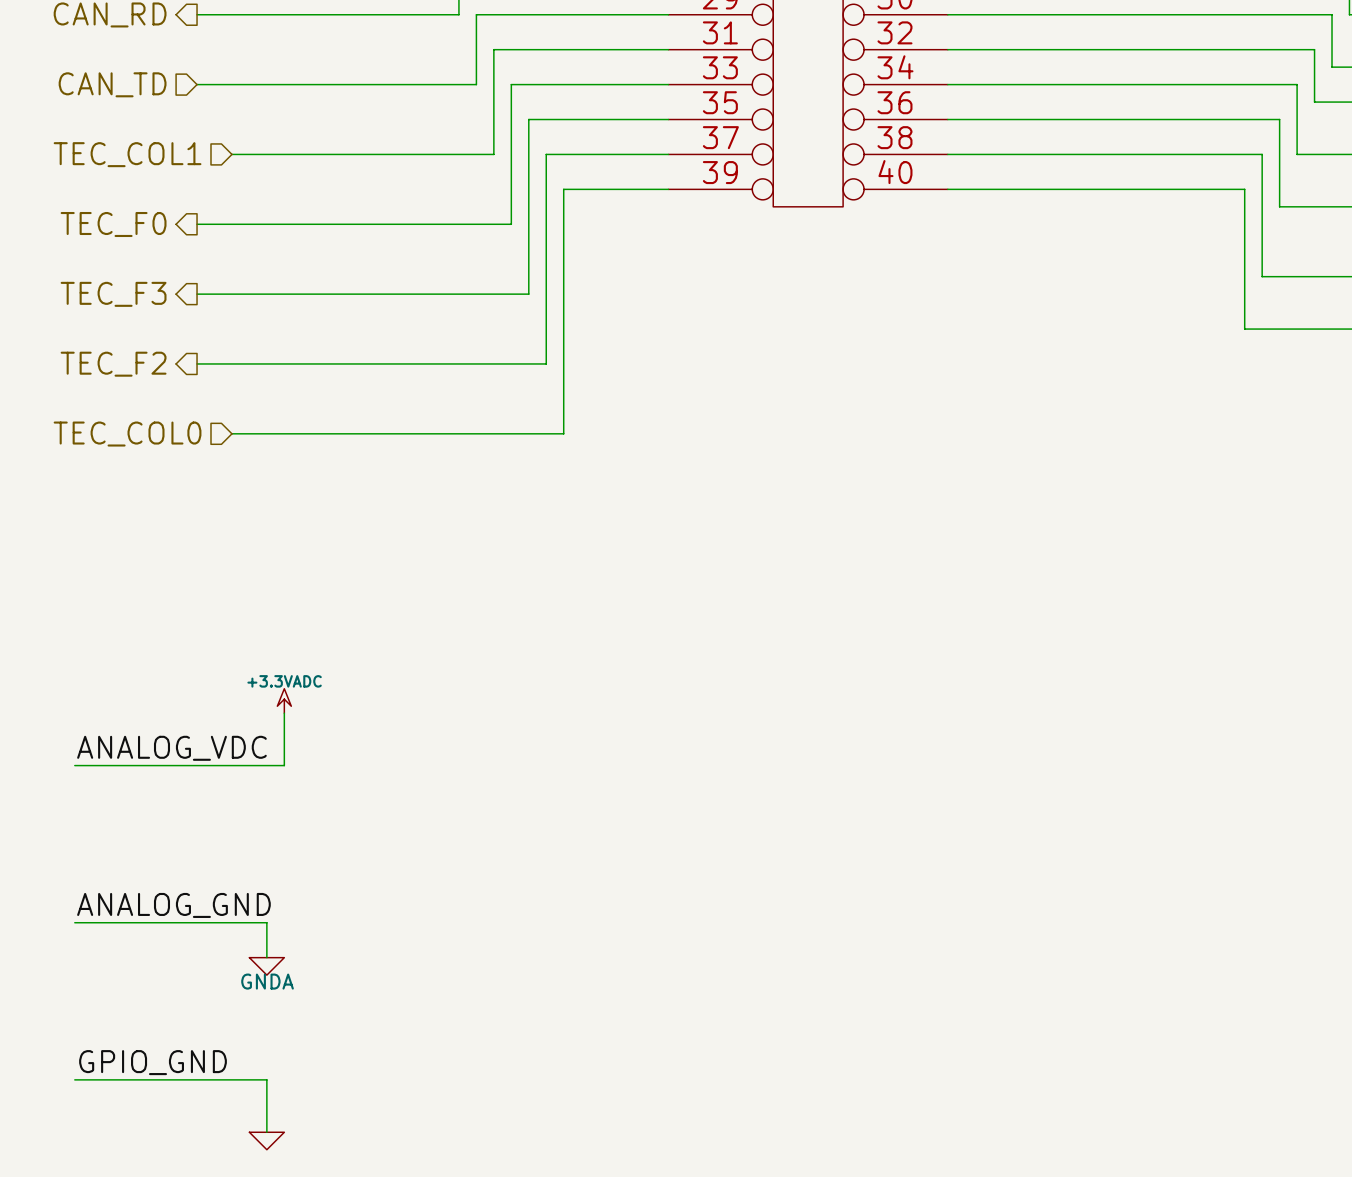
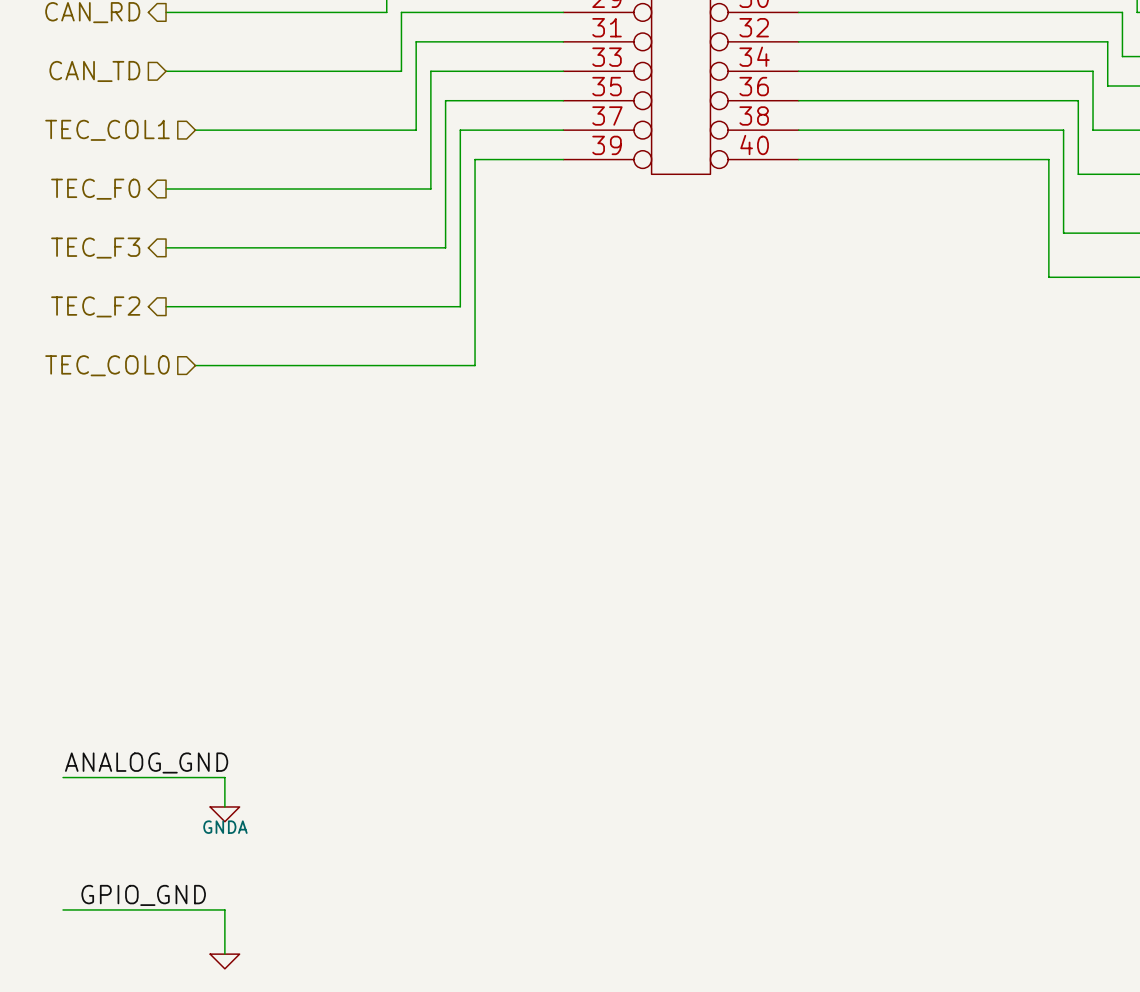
power symbol: +3.3VADC (284, 700) -> none
wire: (284, 713) (284, 765) (74, 765) -> none
label: ANALOG_VDC (171, 748) -> none
label position: GPIO_GND (153, 1062) -> GPIO_GND (143, 895)

